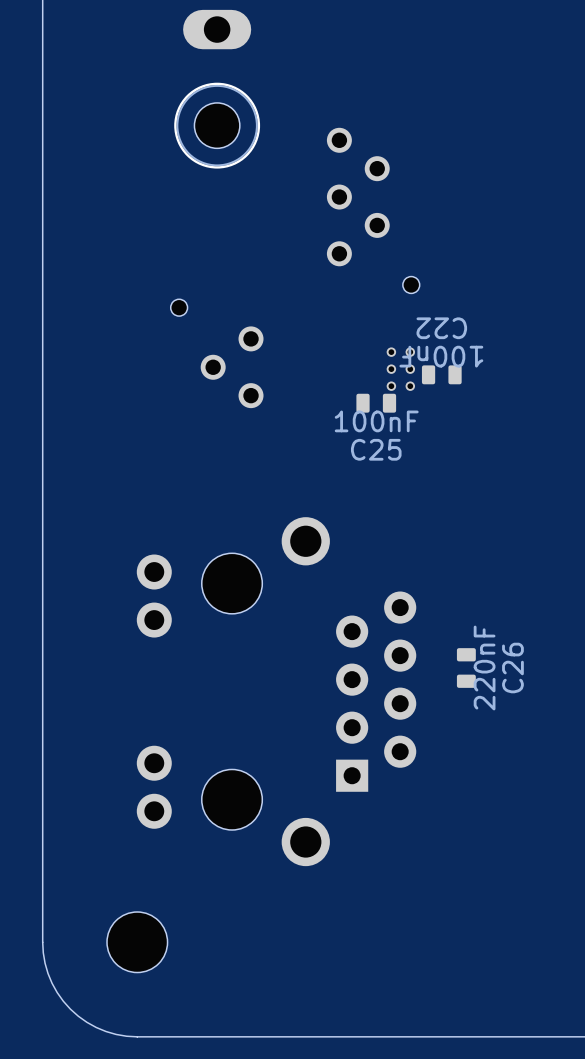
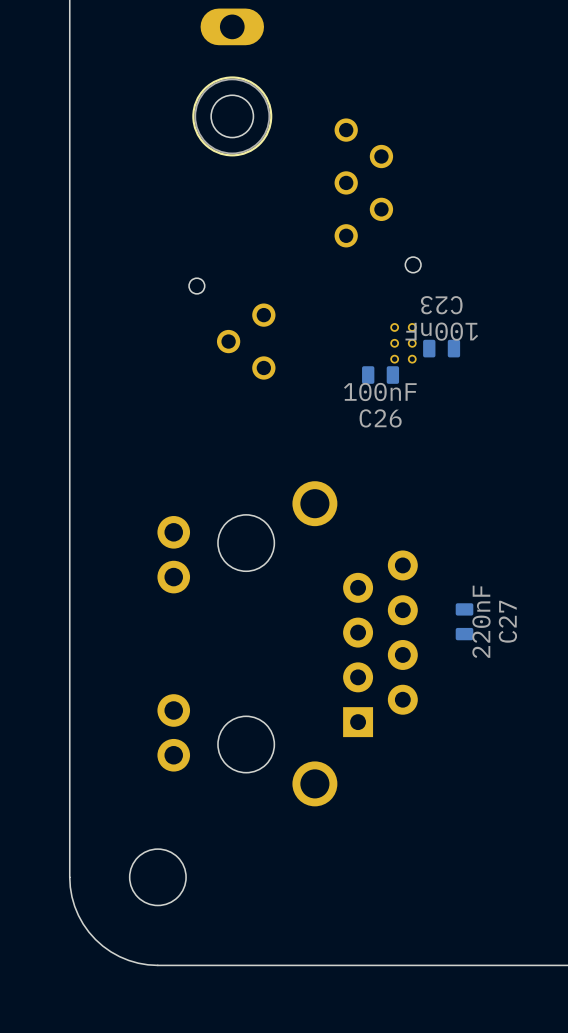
C22 name: C22 (441, 328) -> C23 (441, 305)
C25 name: C25 (376, 449) -> C26 (380, 418)
C26 name: C26 (512, 668) -> C27 (507, 621)

